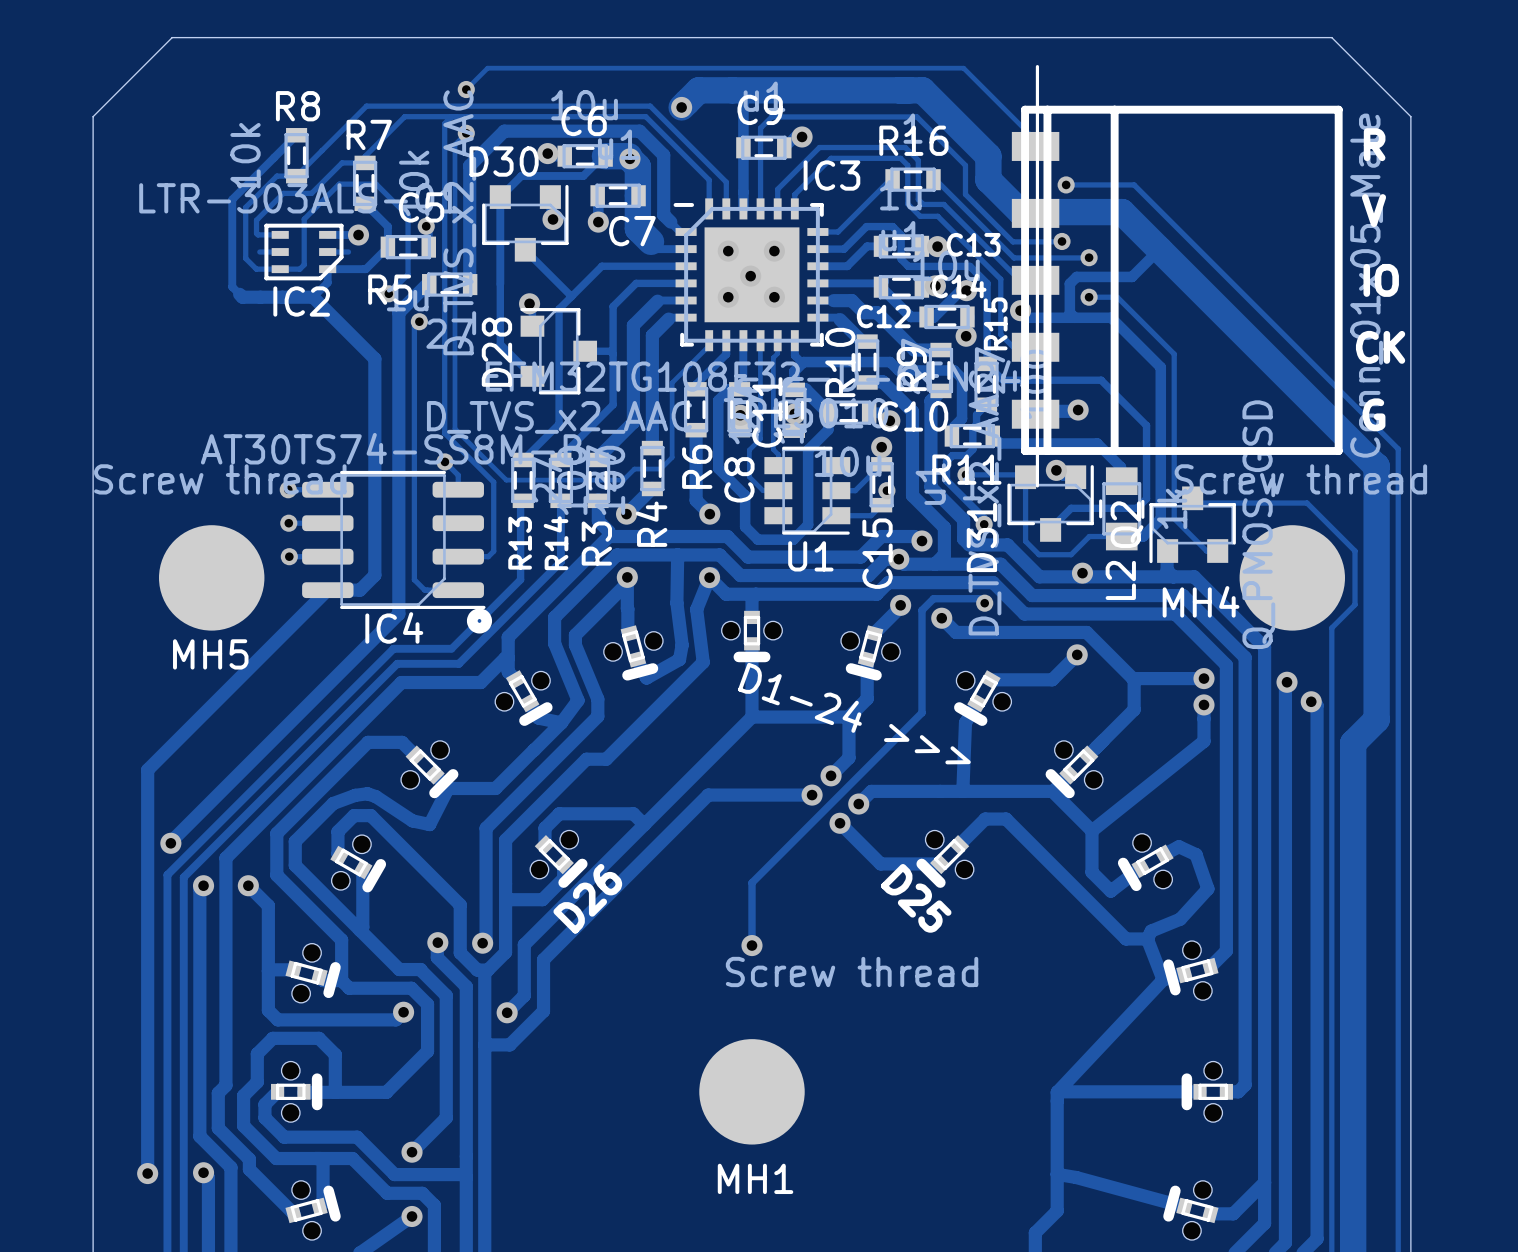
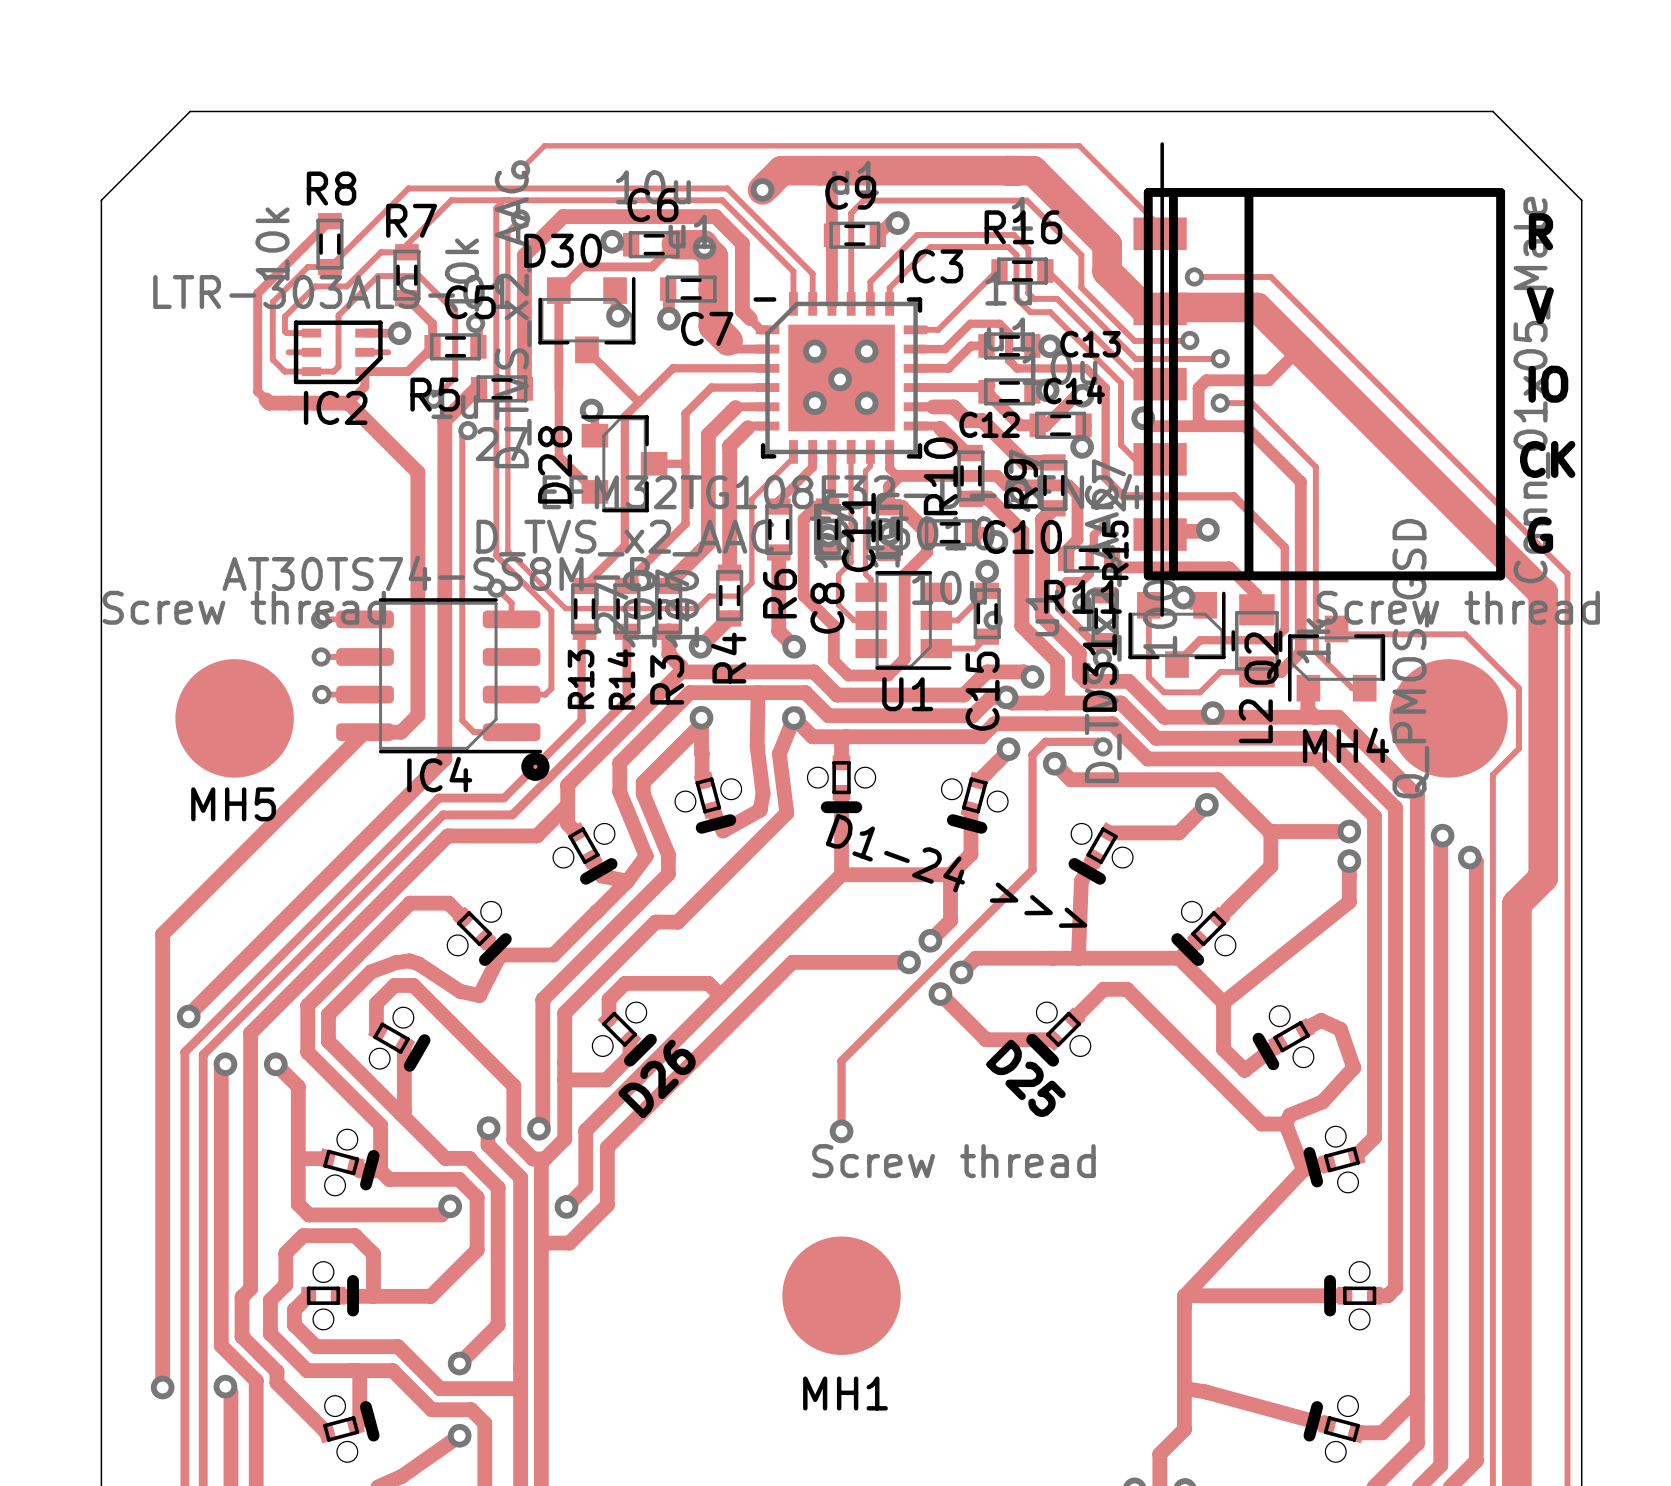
R15 position: (986, 384) -> (1105, 618)
track: (966, 474) (1023, 474) -> none

